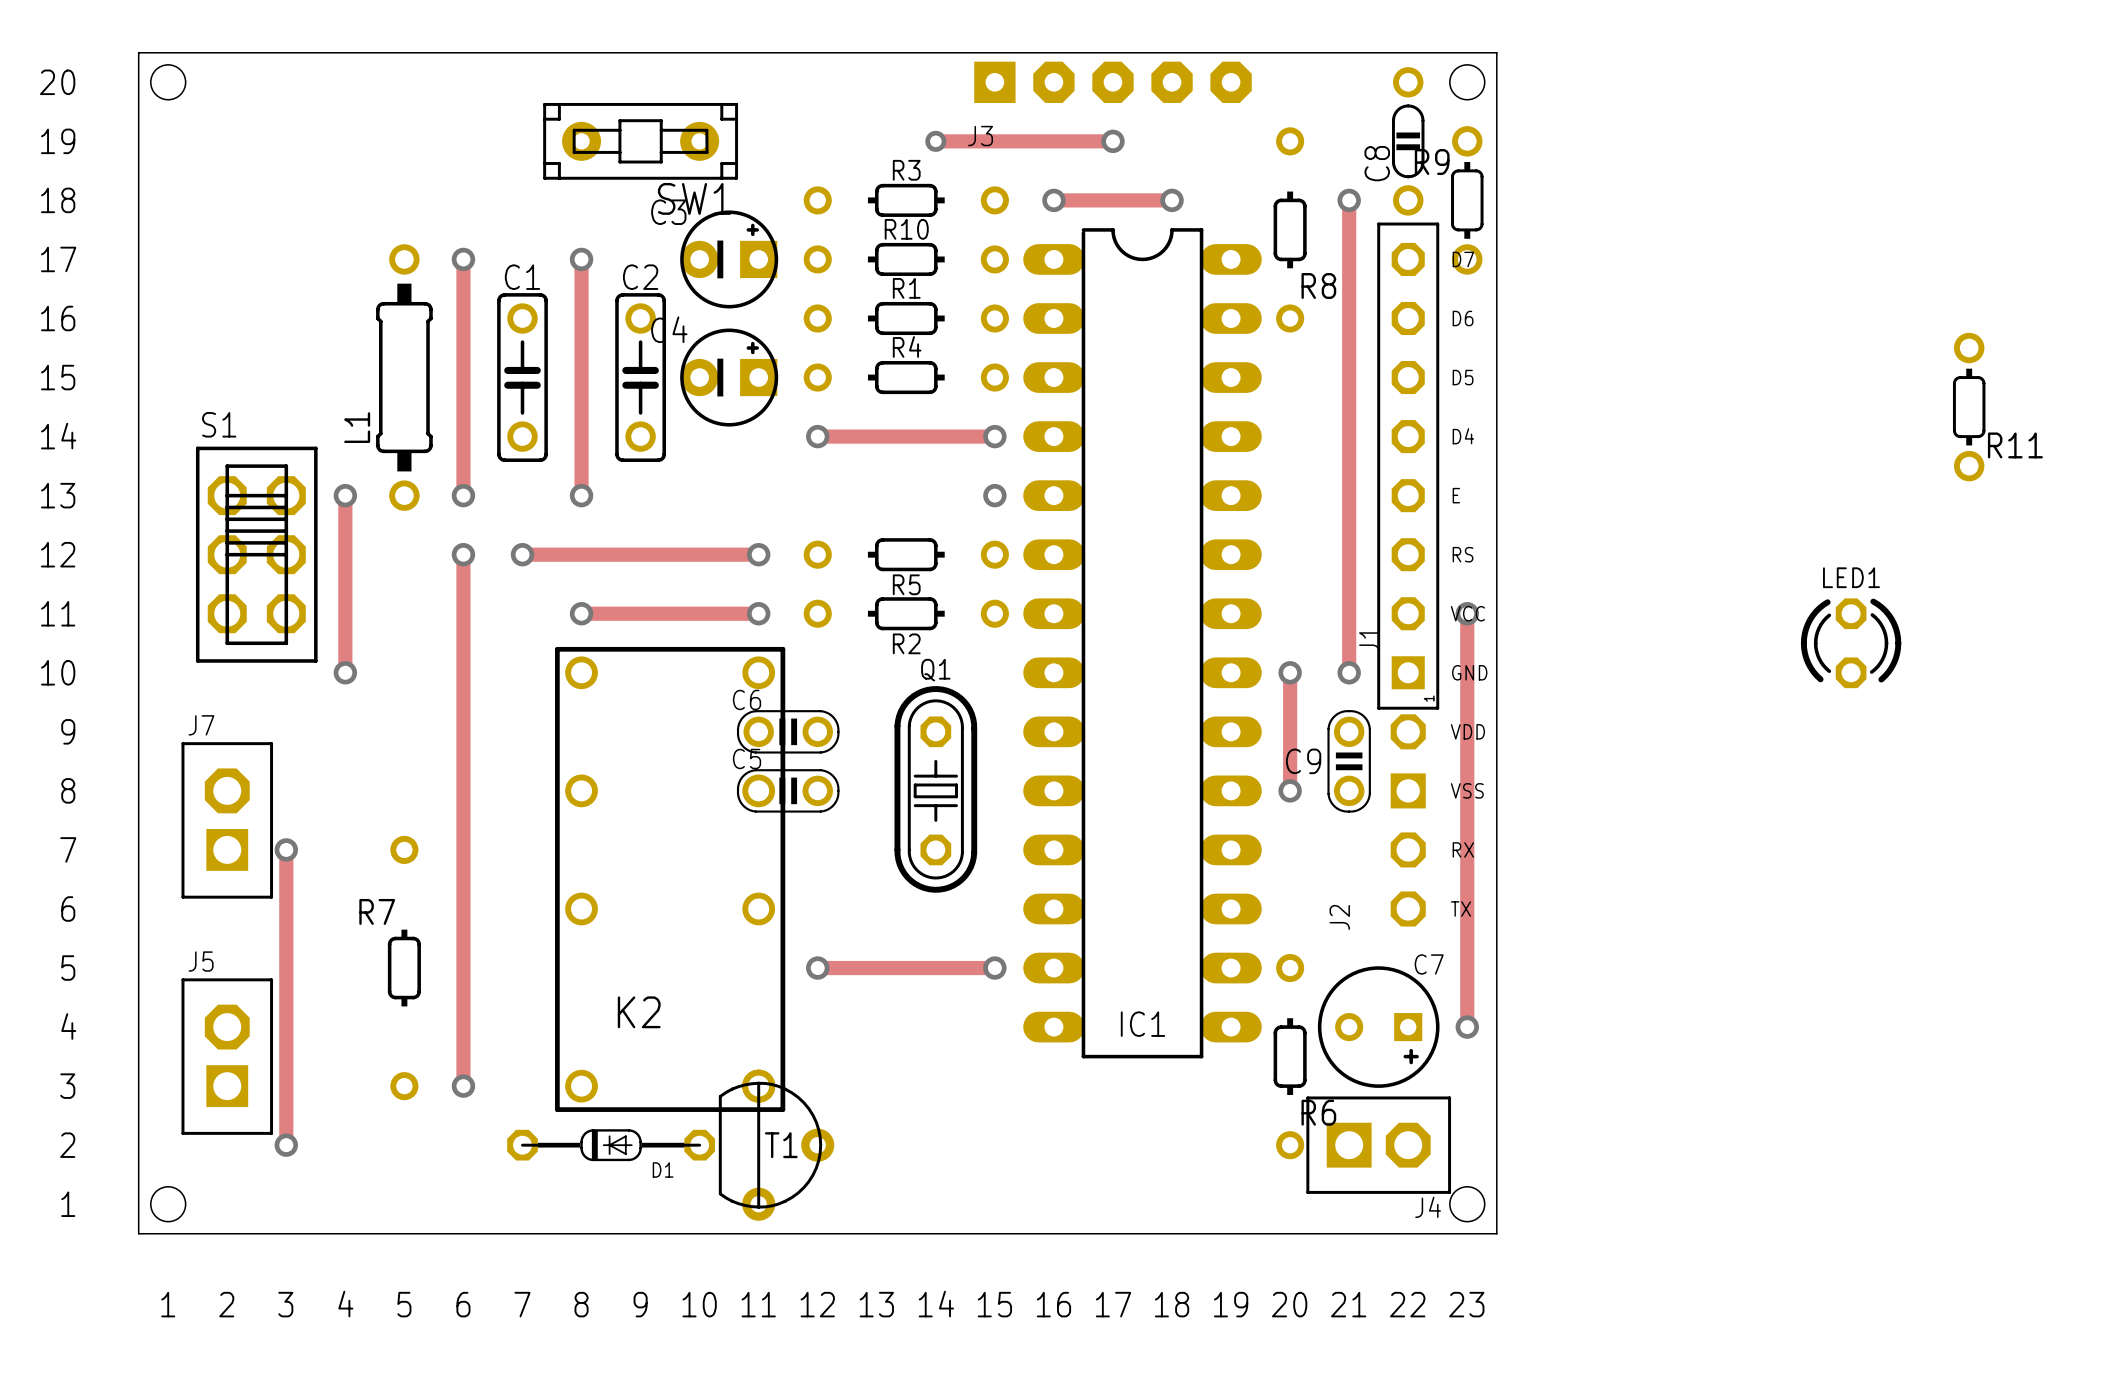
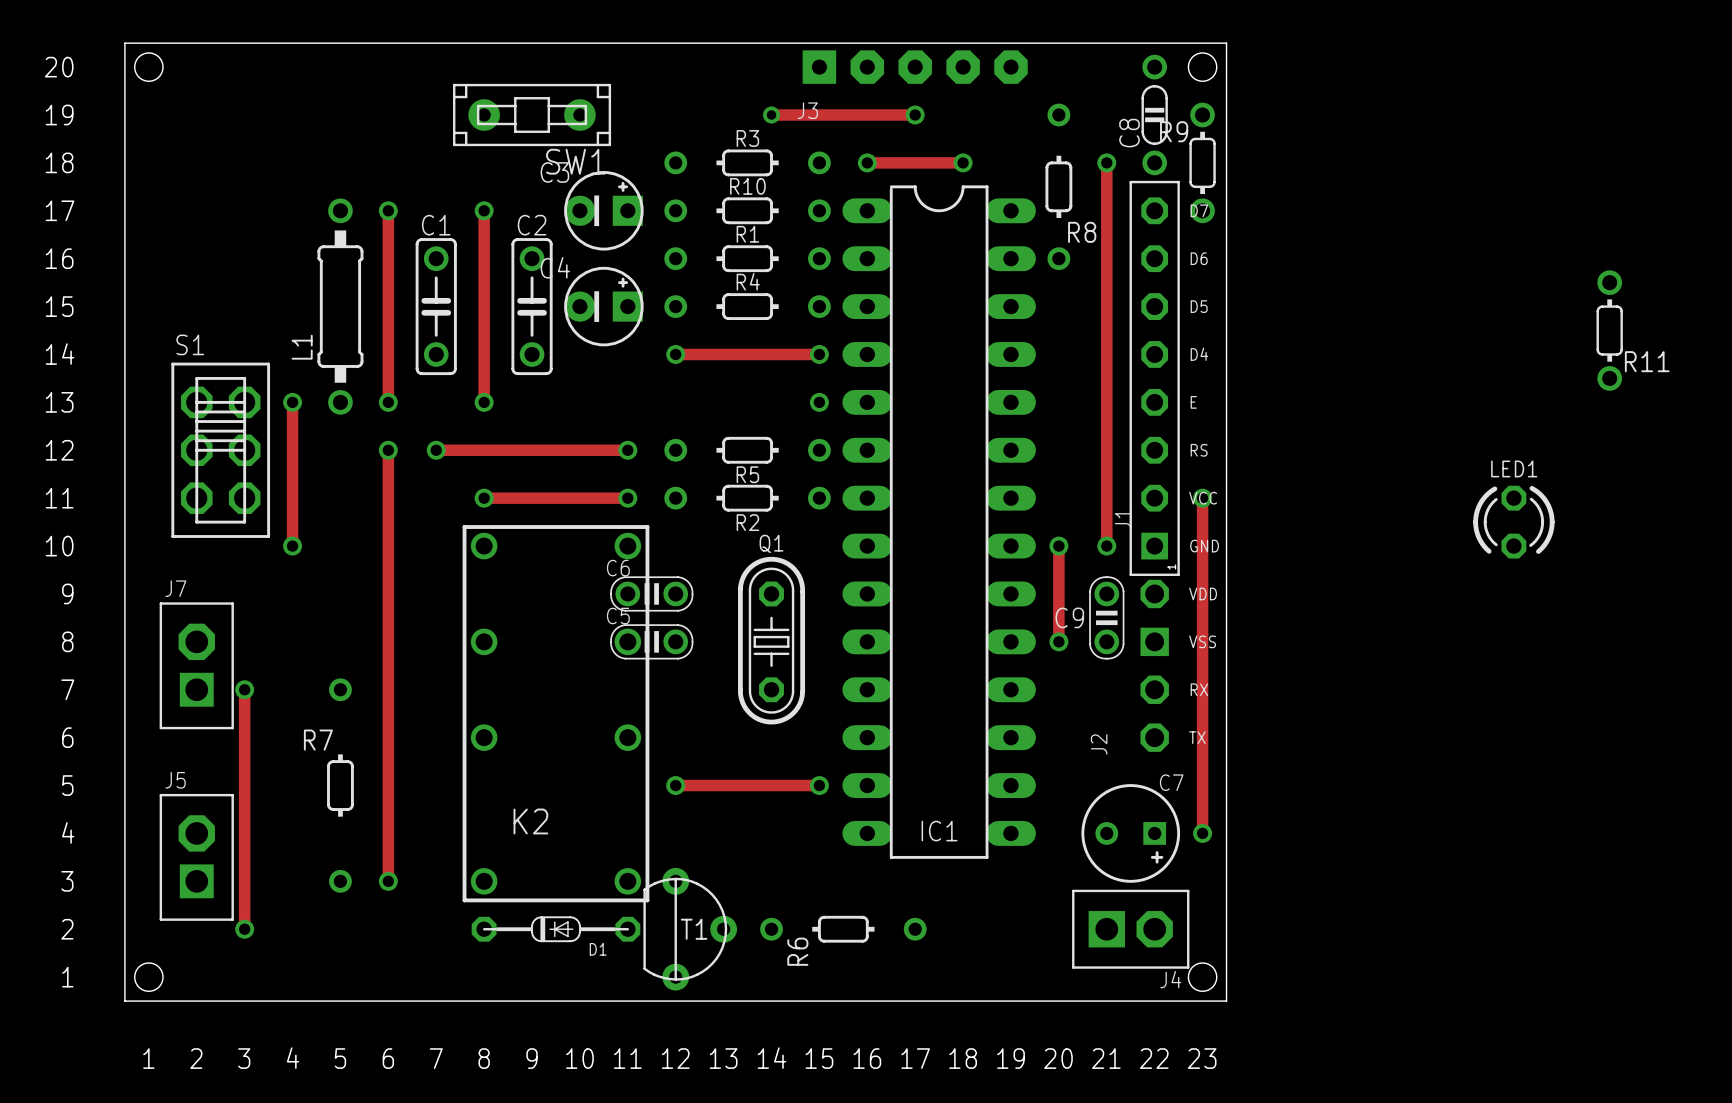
R6 rotation: 0° (1290, 1056) -> 90° clockwise (843, 929)
R6 position: (1290, 1056) -> (843, 929)
D1 position: (611, 1145) -> (555, 929)
T1 position: (776, 1145) -> (690, 929)

